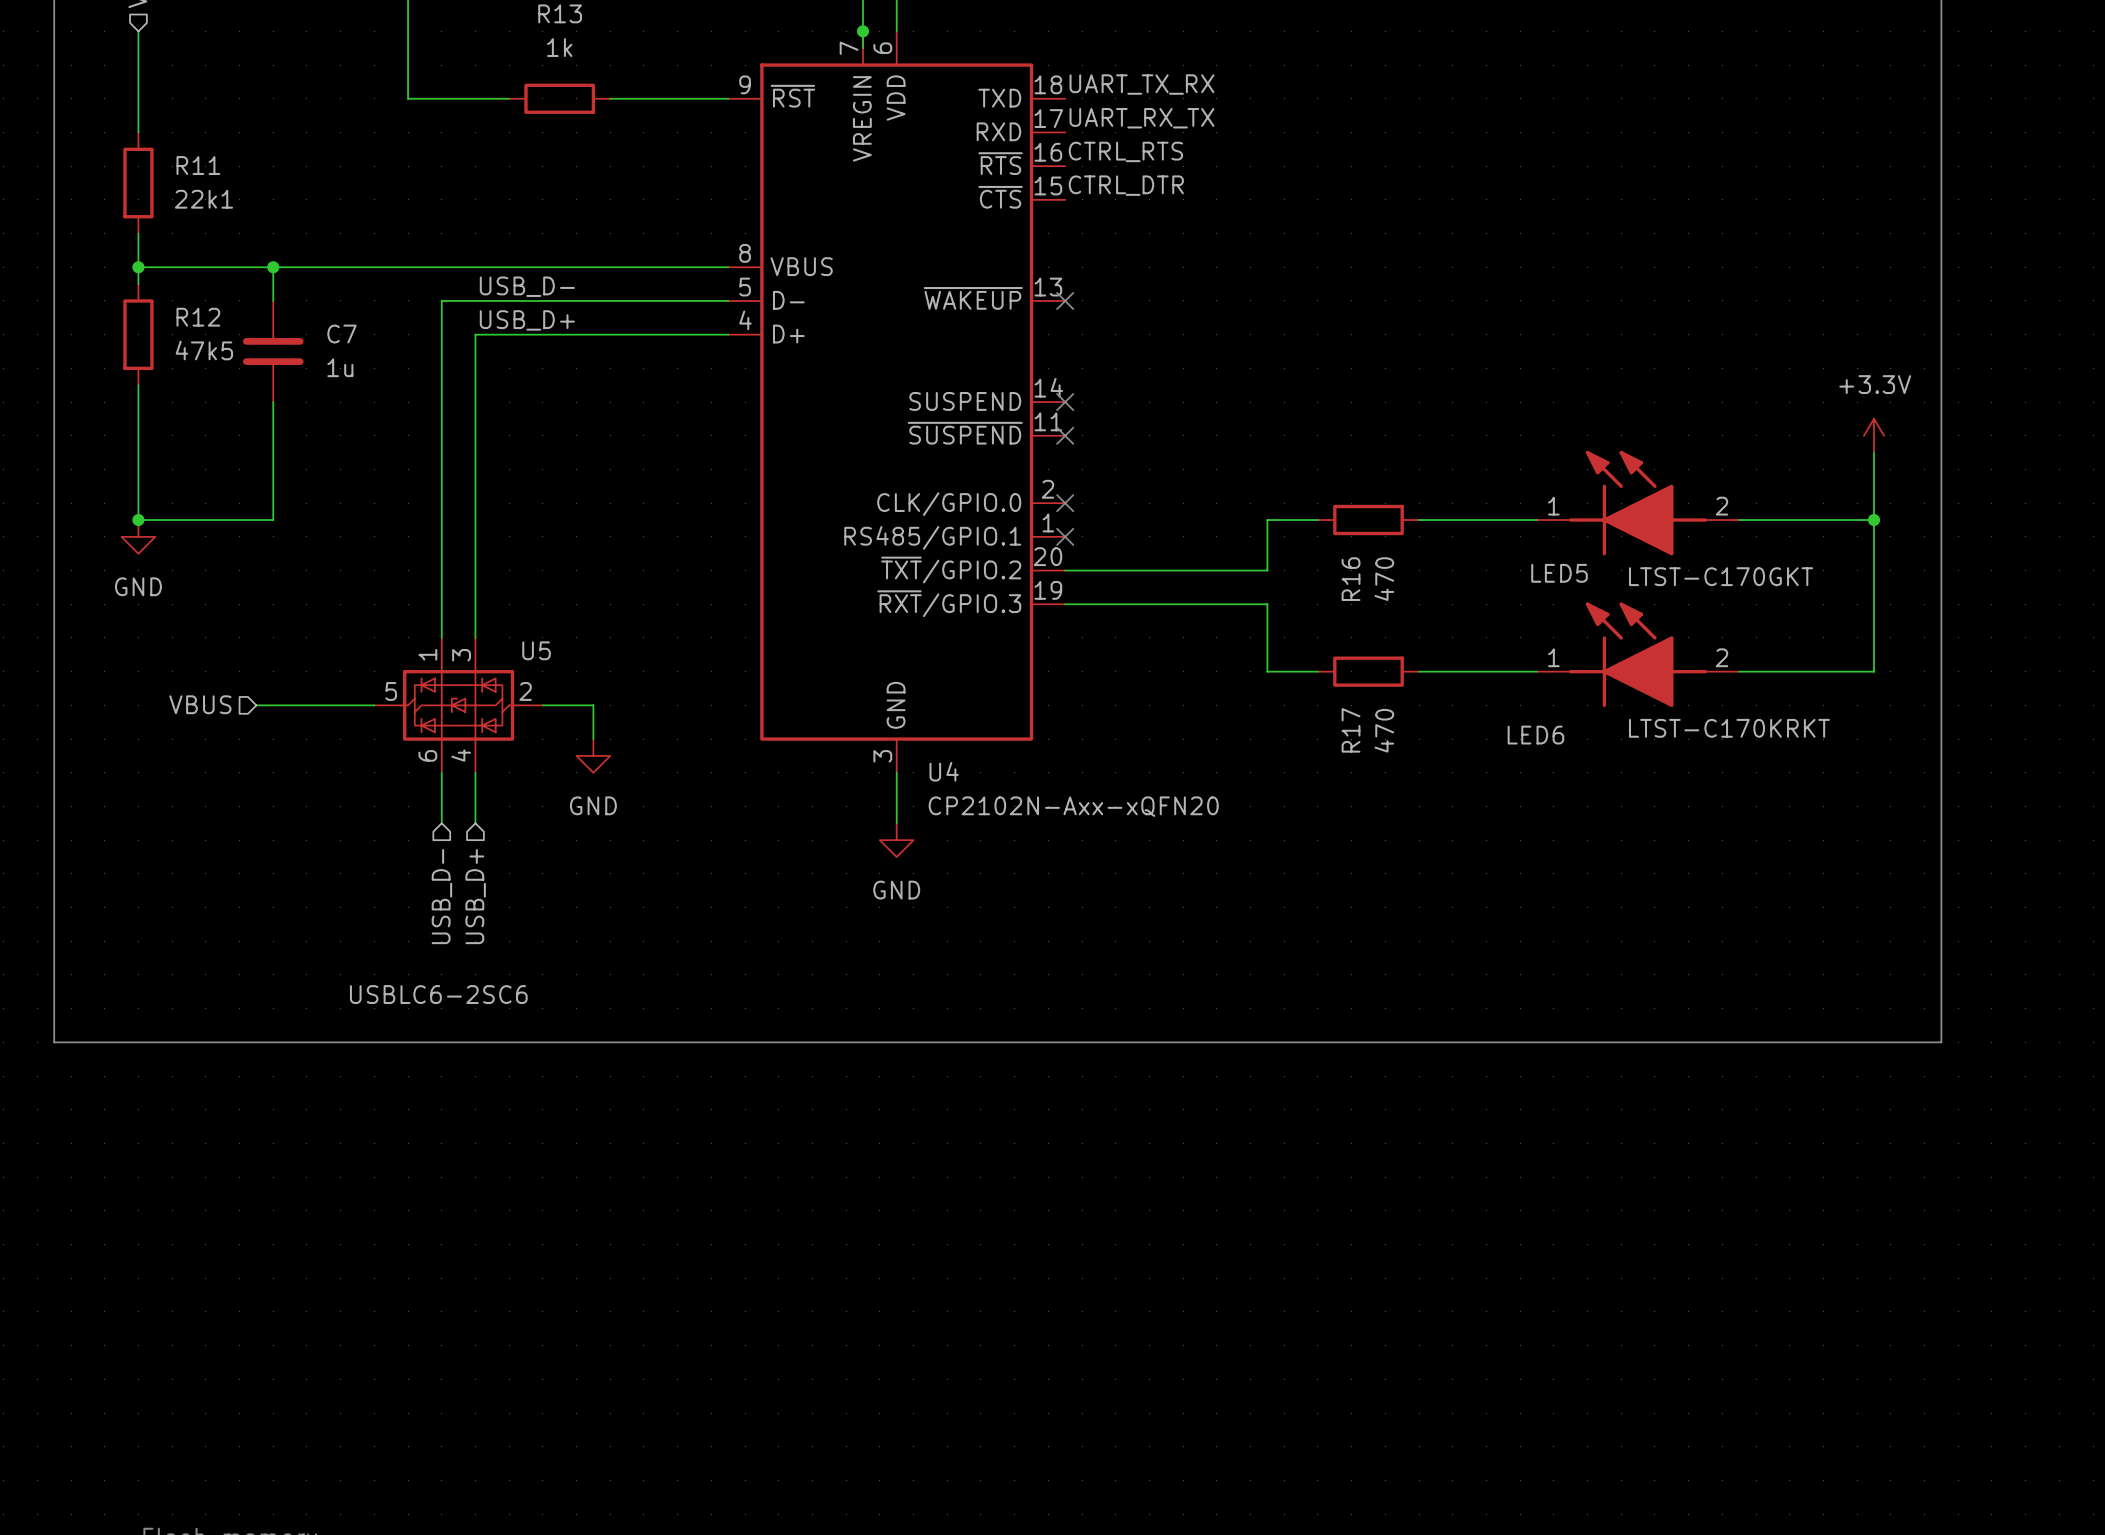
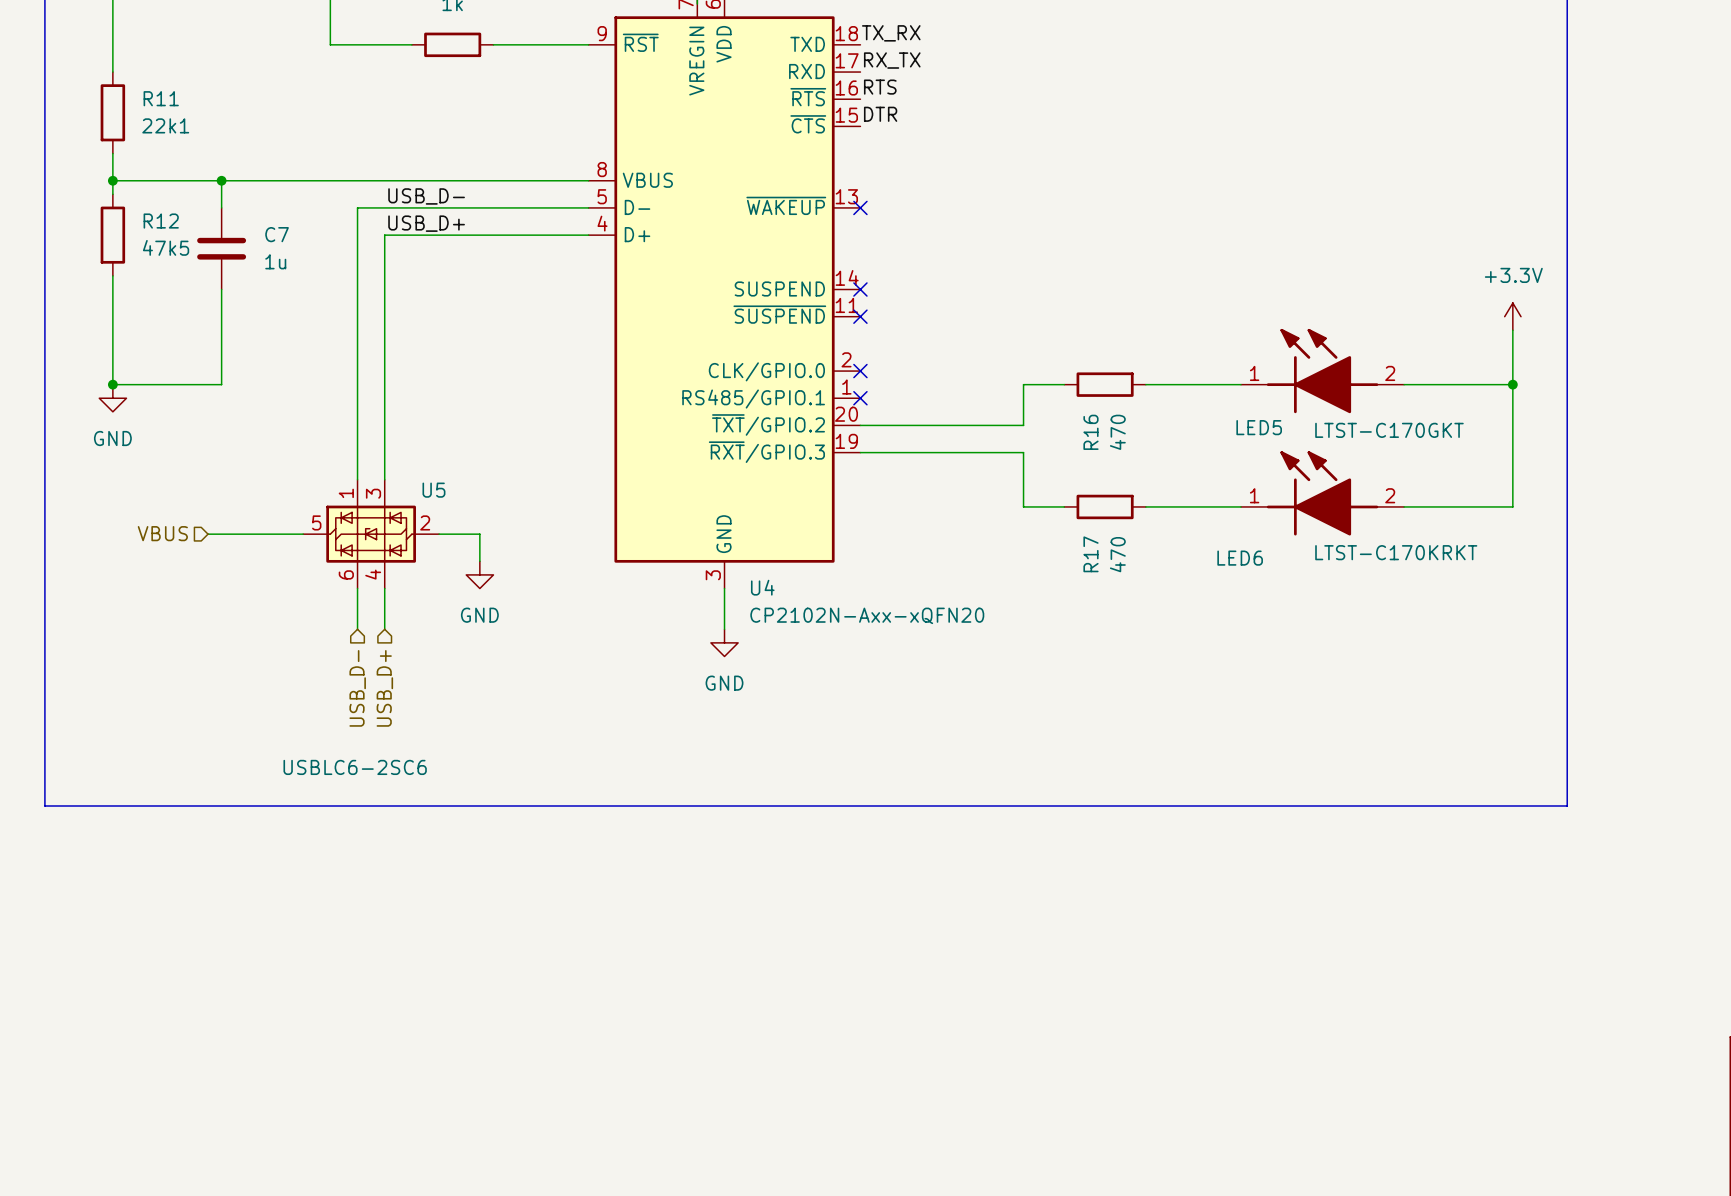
label: UART_TX_RX (1141, 84) -> TX_RX (891, 33)
label: UART_RX_TX (1141, 118) -> RX_TX (892, 60)
label: CTRL_RTS (1125, 151) -> RTS (880, 87)
label: CTRL_DTR (1126, 185) -> DTR (880, 114)

